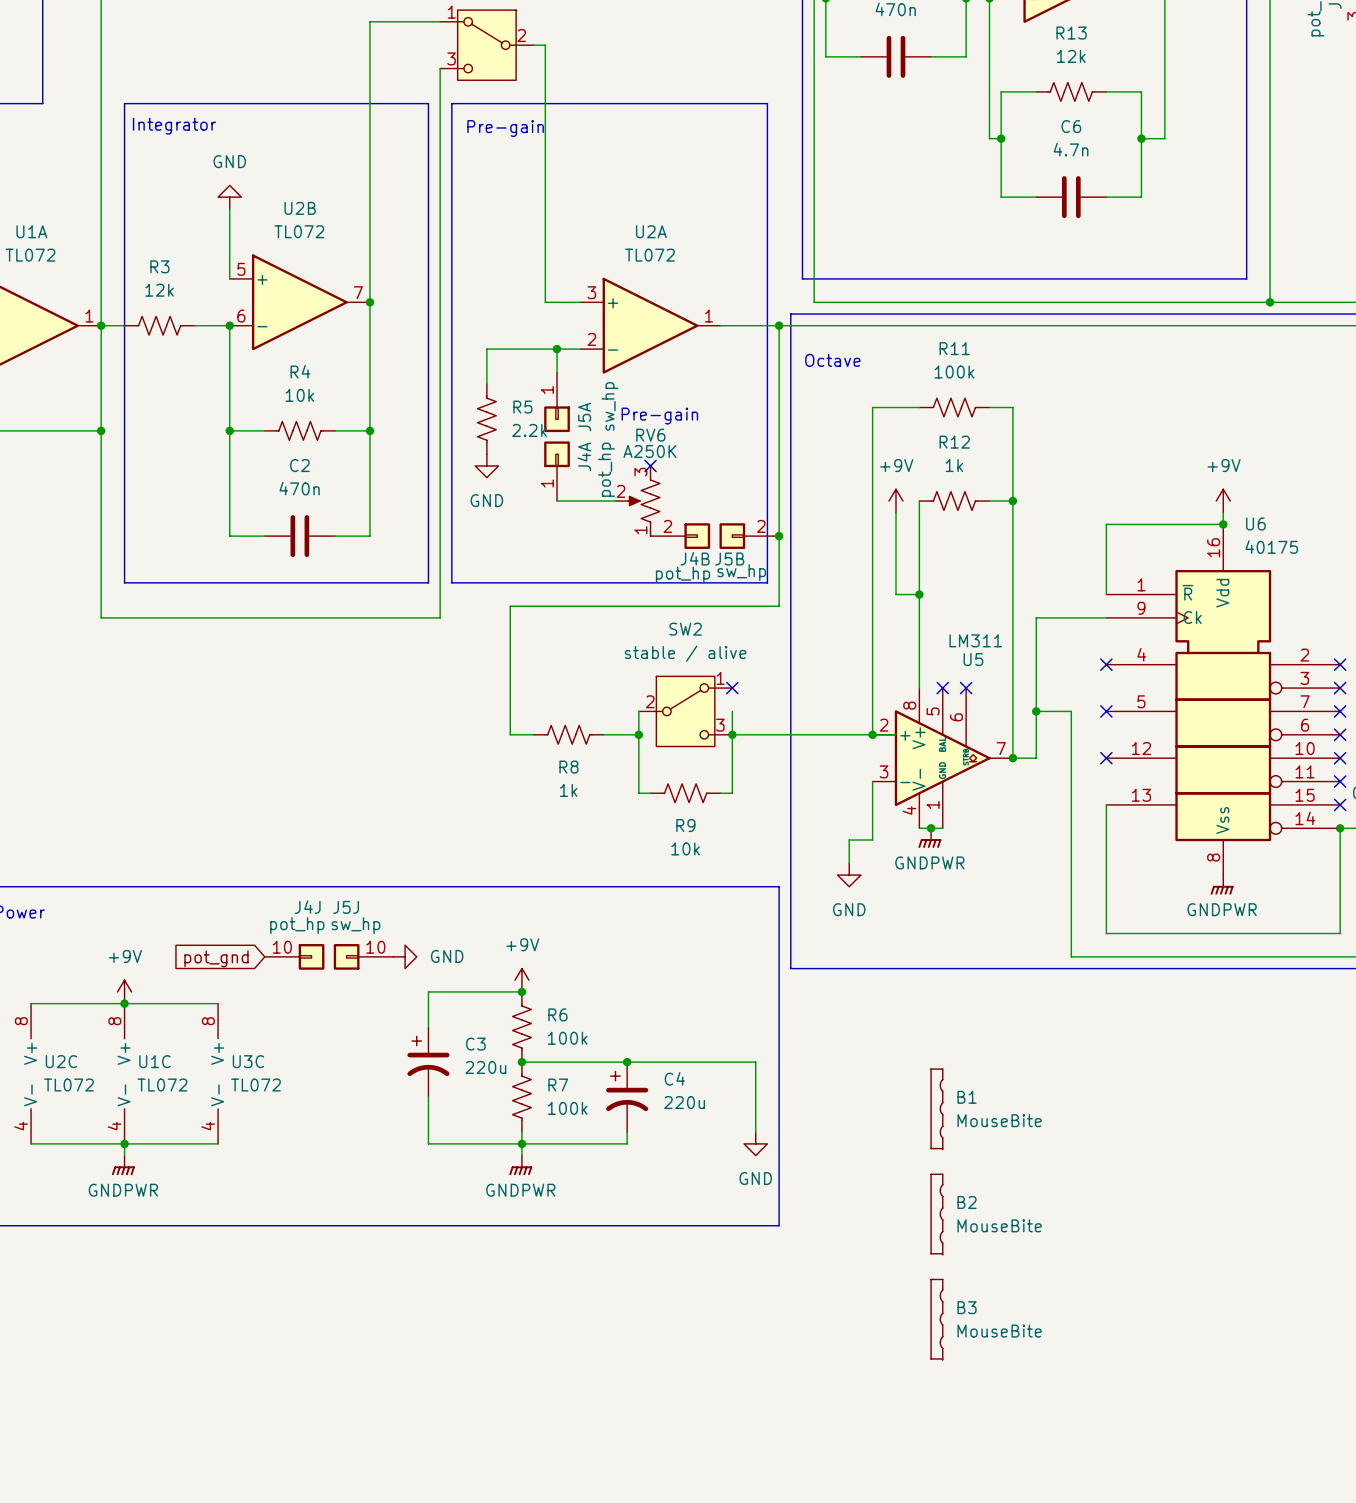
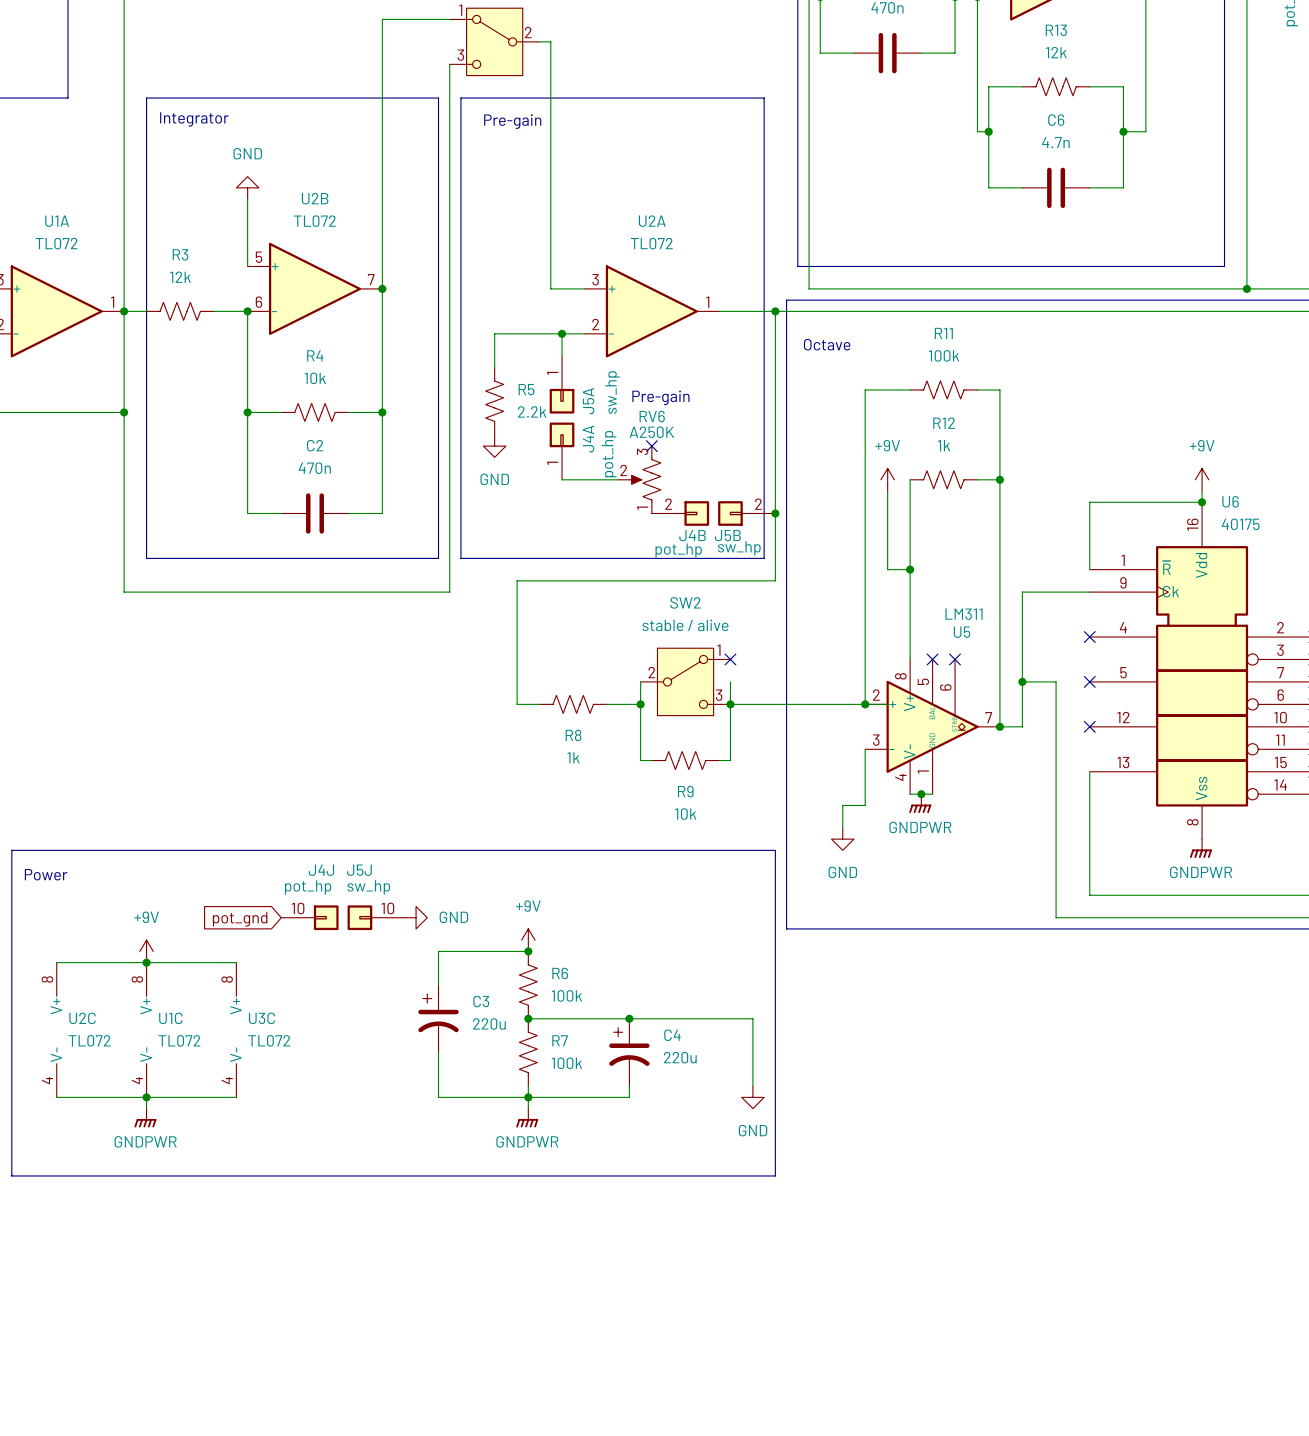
B1: MouseBite (936, 1109) -> none
B2: MouseBite (936, 1214) -> none
B3: MouseBite (936, 1319) -> none

